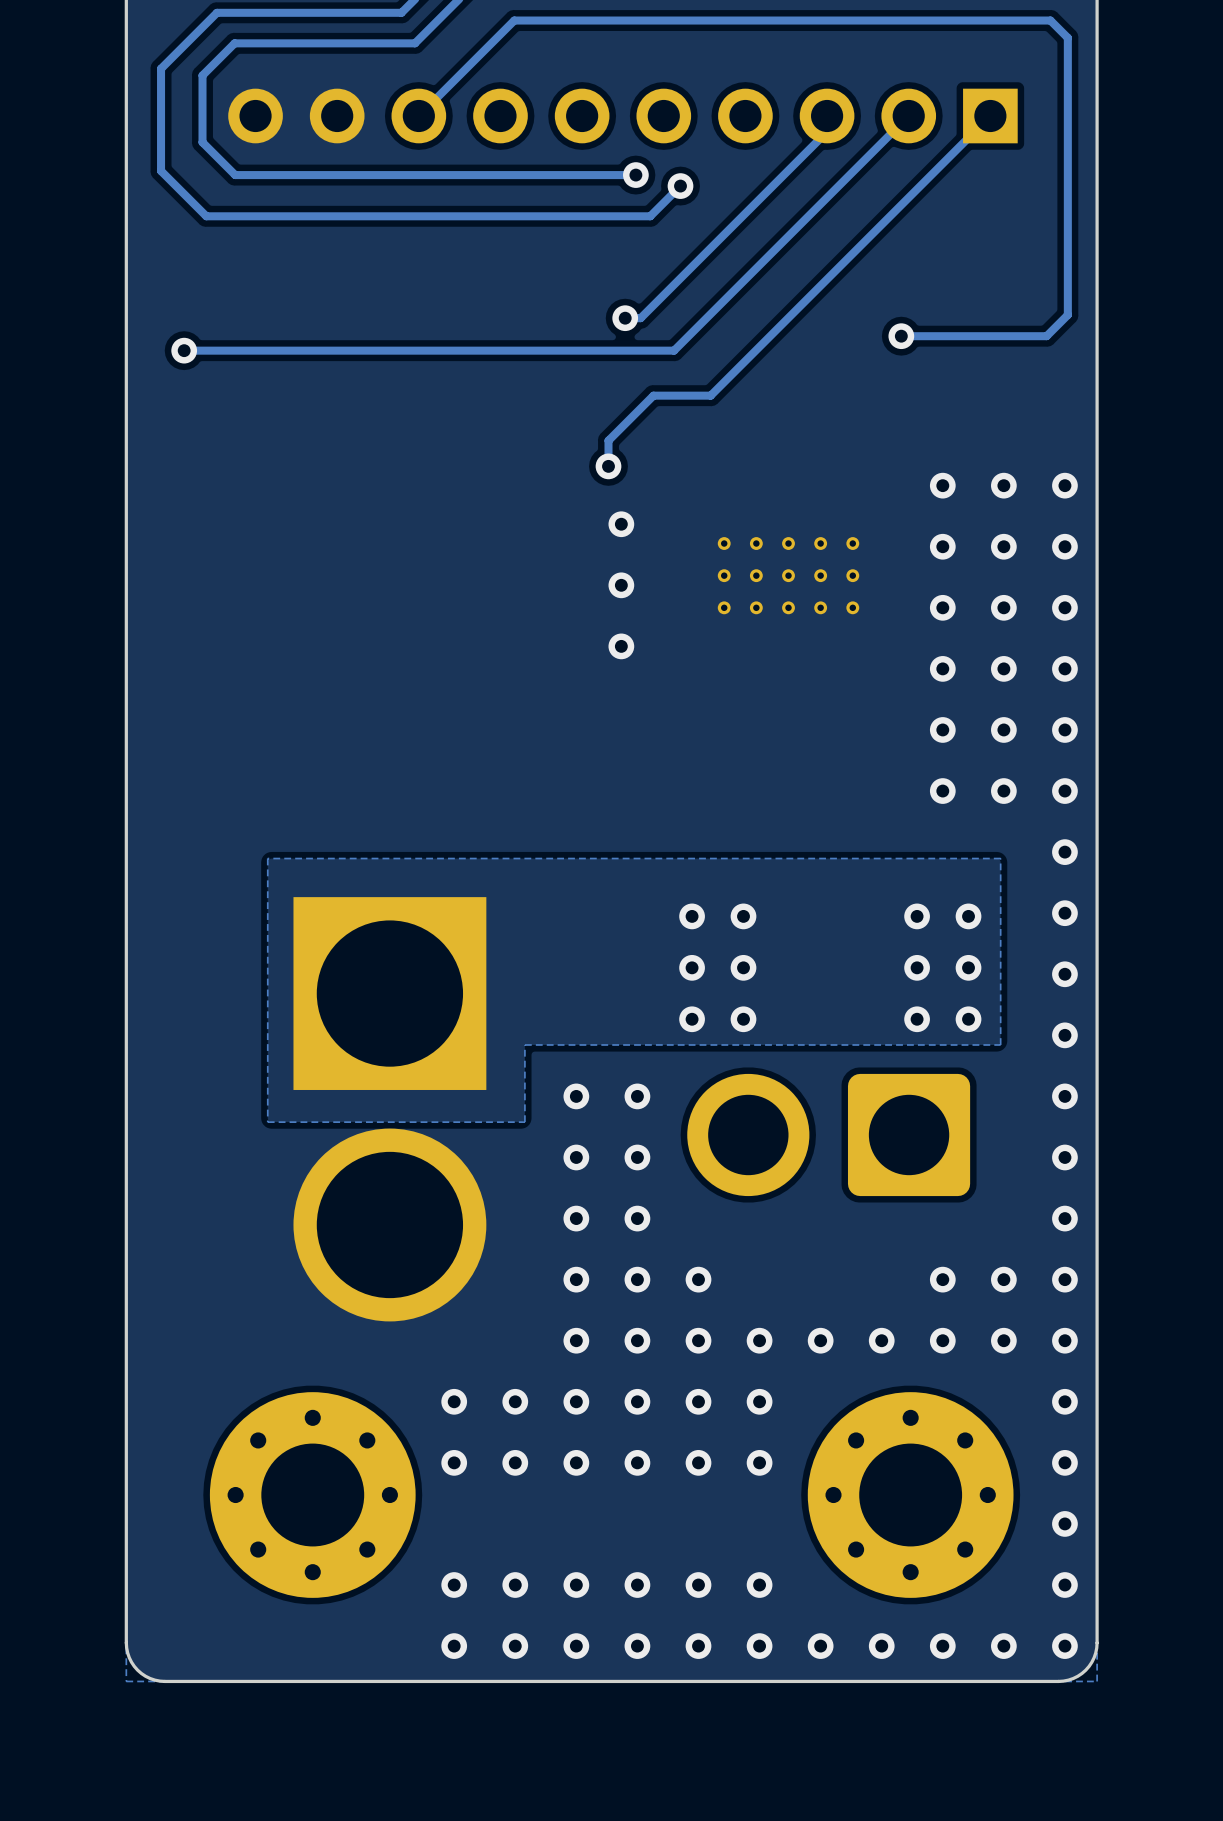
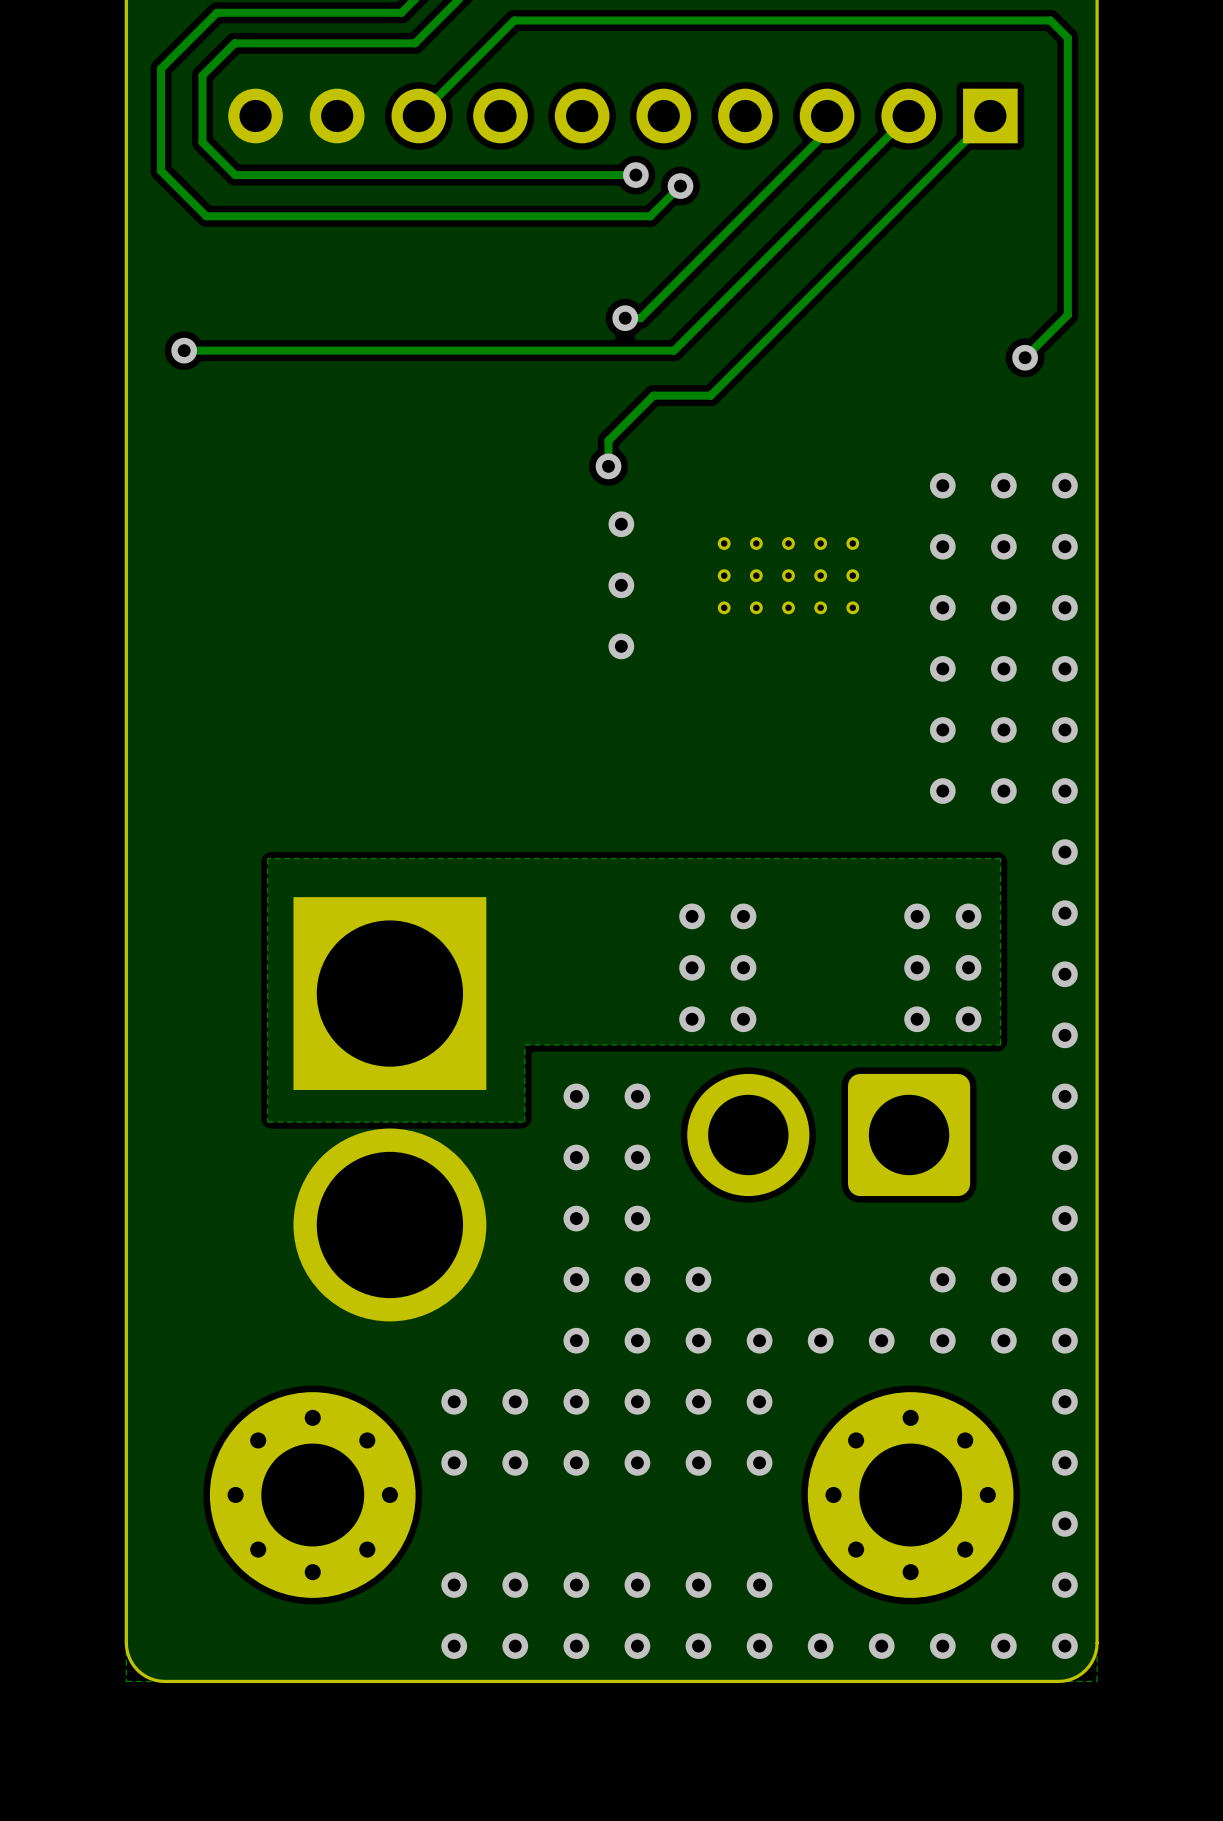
via position: (901, 336) -> (1025, 357)
track: (1046, 336) (901, 336) -> (1046, 336) (1025, 357)

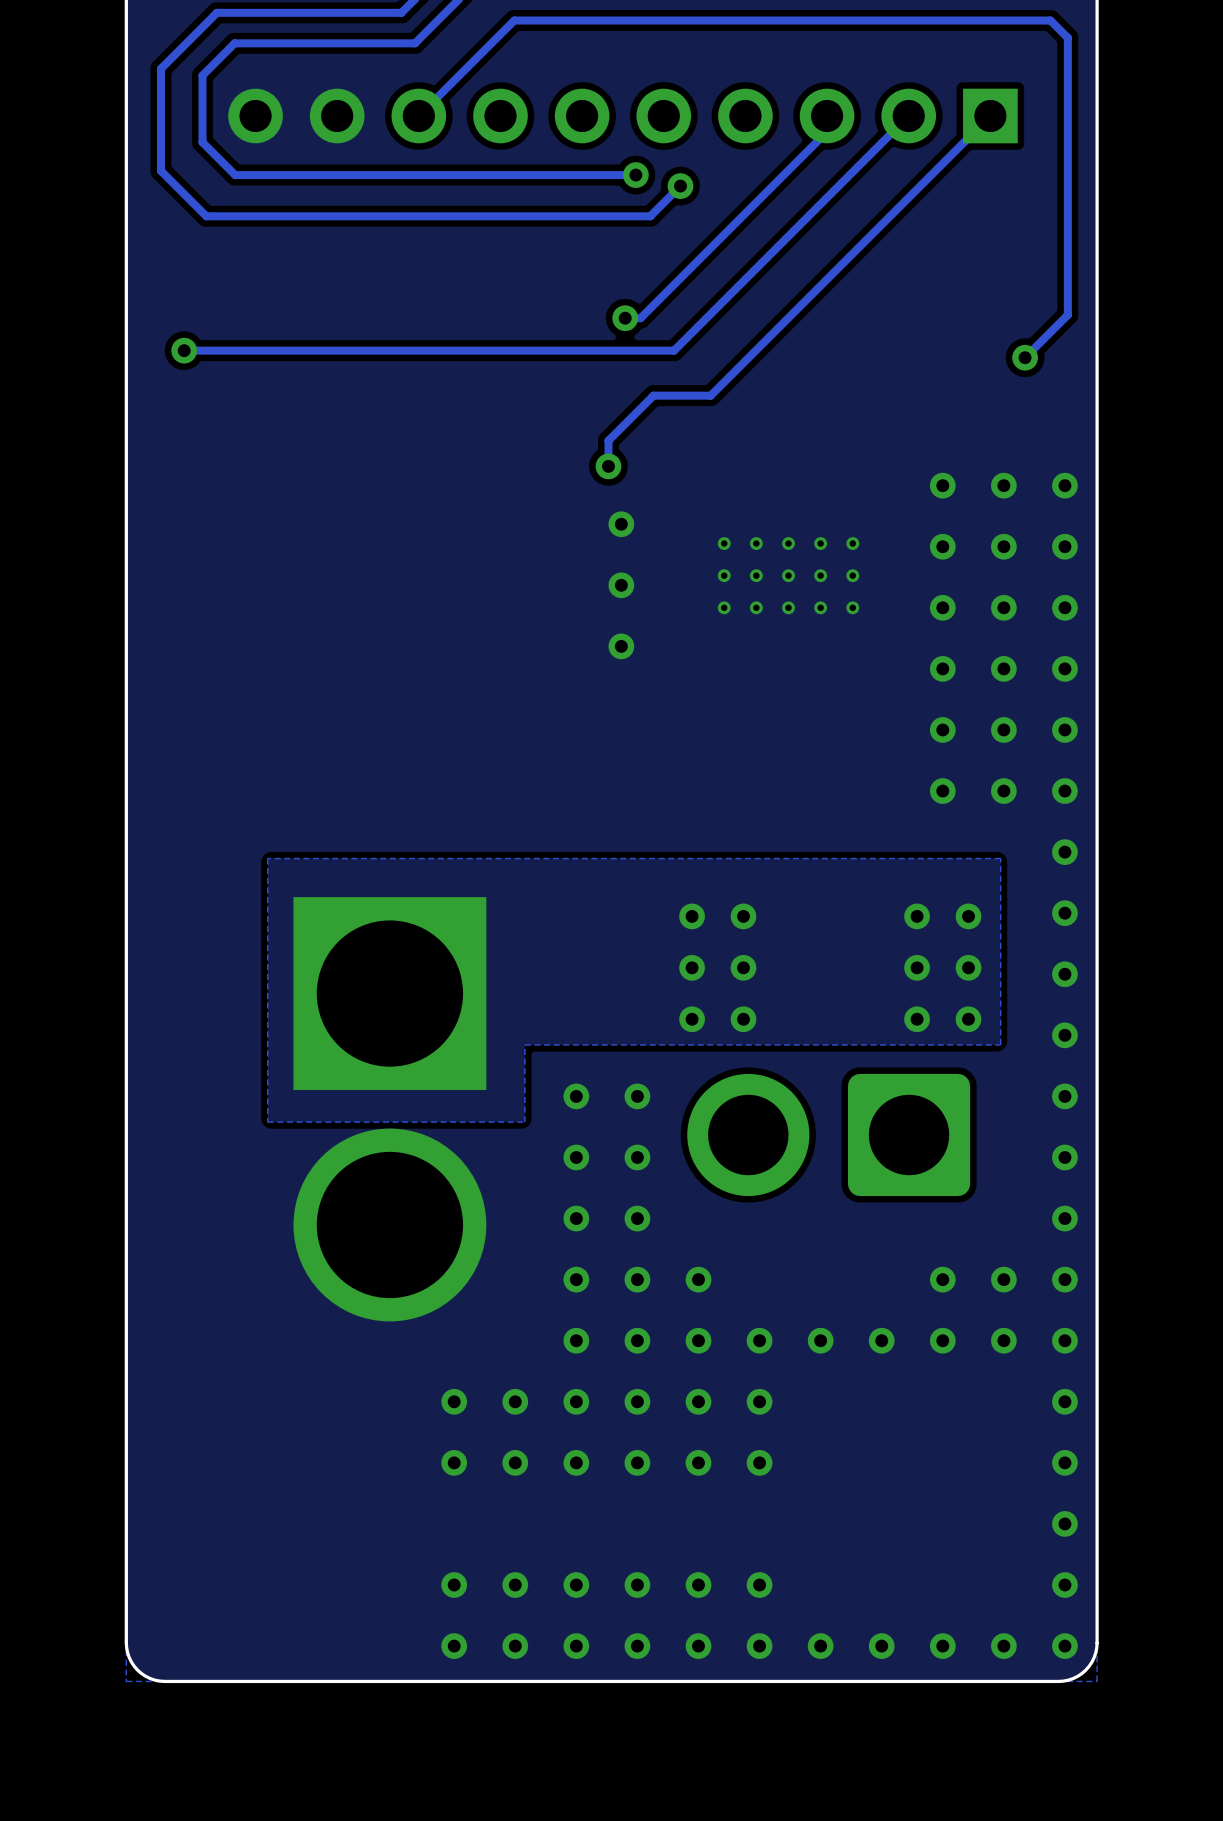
part: (312, 1495) -> none
part: (910, 1495) -> none

